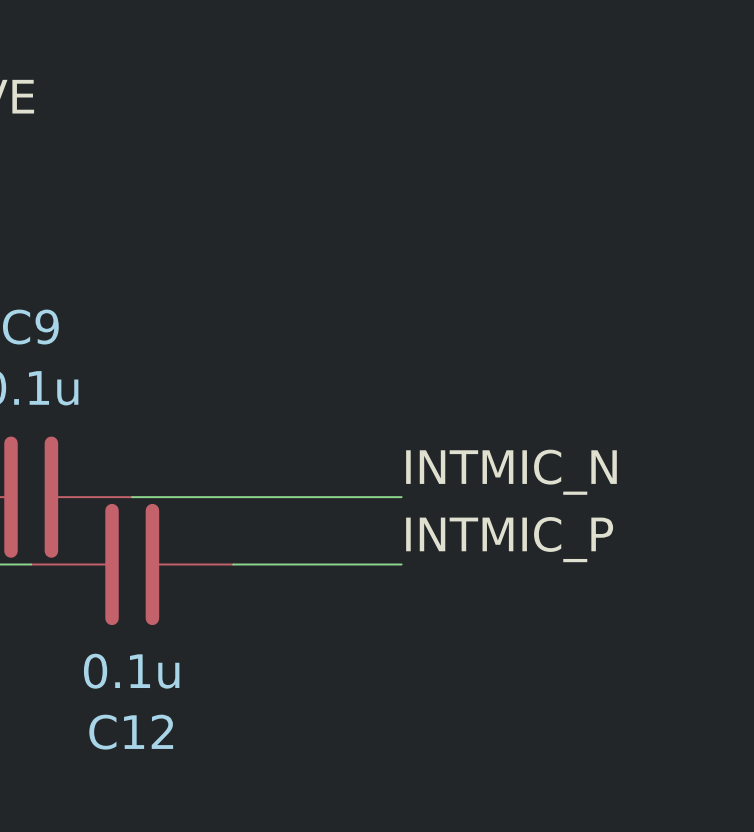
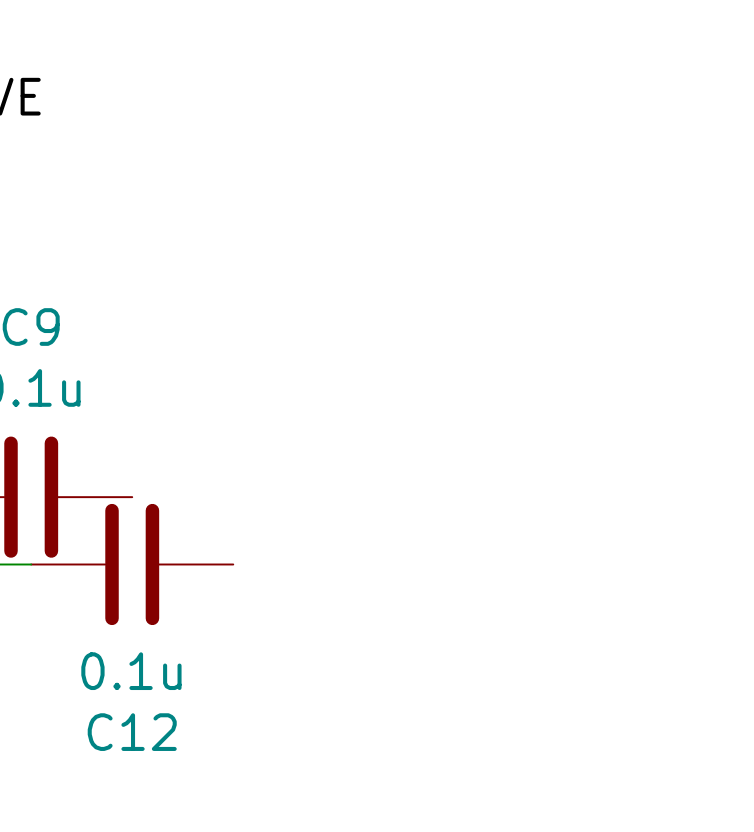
label: INTMIC_N (511, 472) -> none
wire: (132, 497) (401, 497) -> none
label: INTMIC_P (509, 539) -> none
wire: (233, 564) (401, 564) -> none

